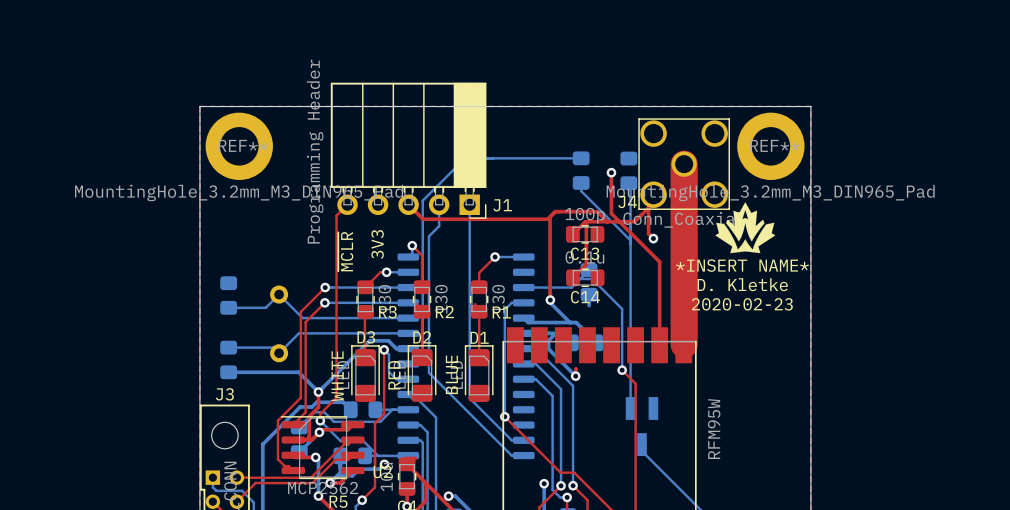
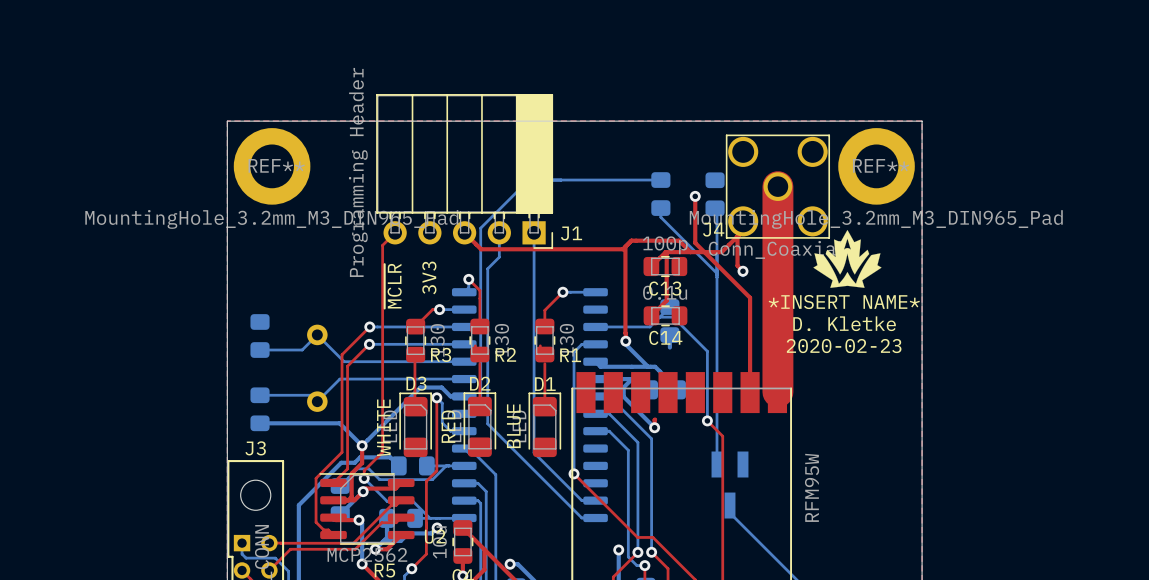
top track: (406, 458) (415, 458) -> none

